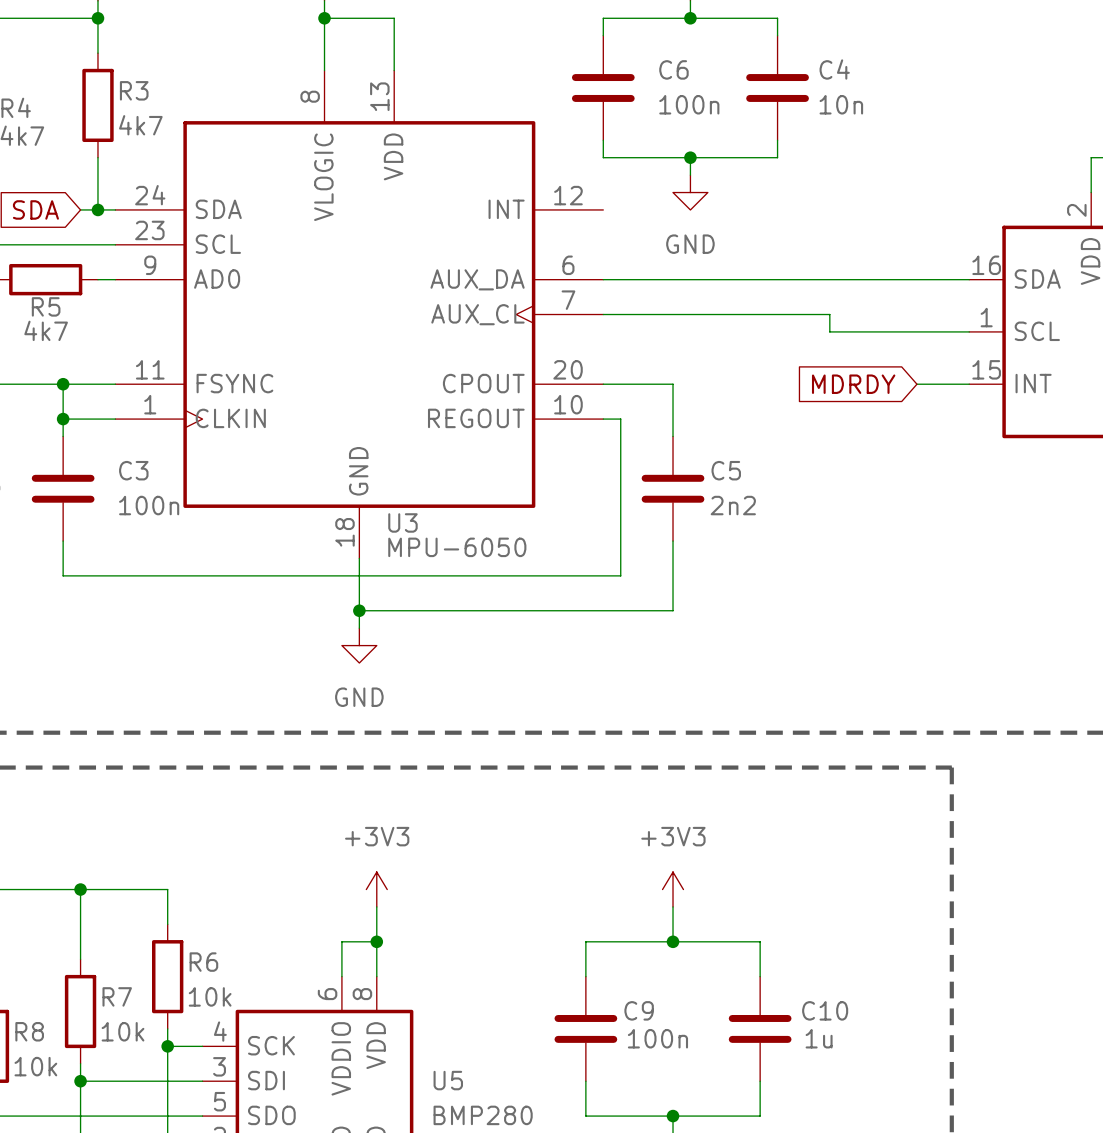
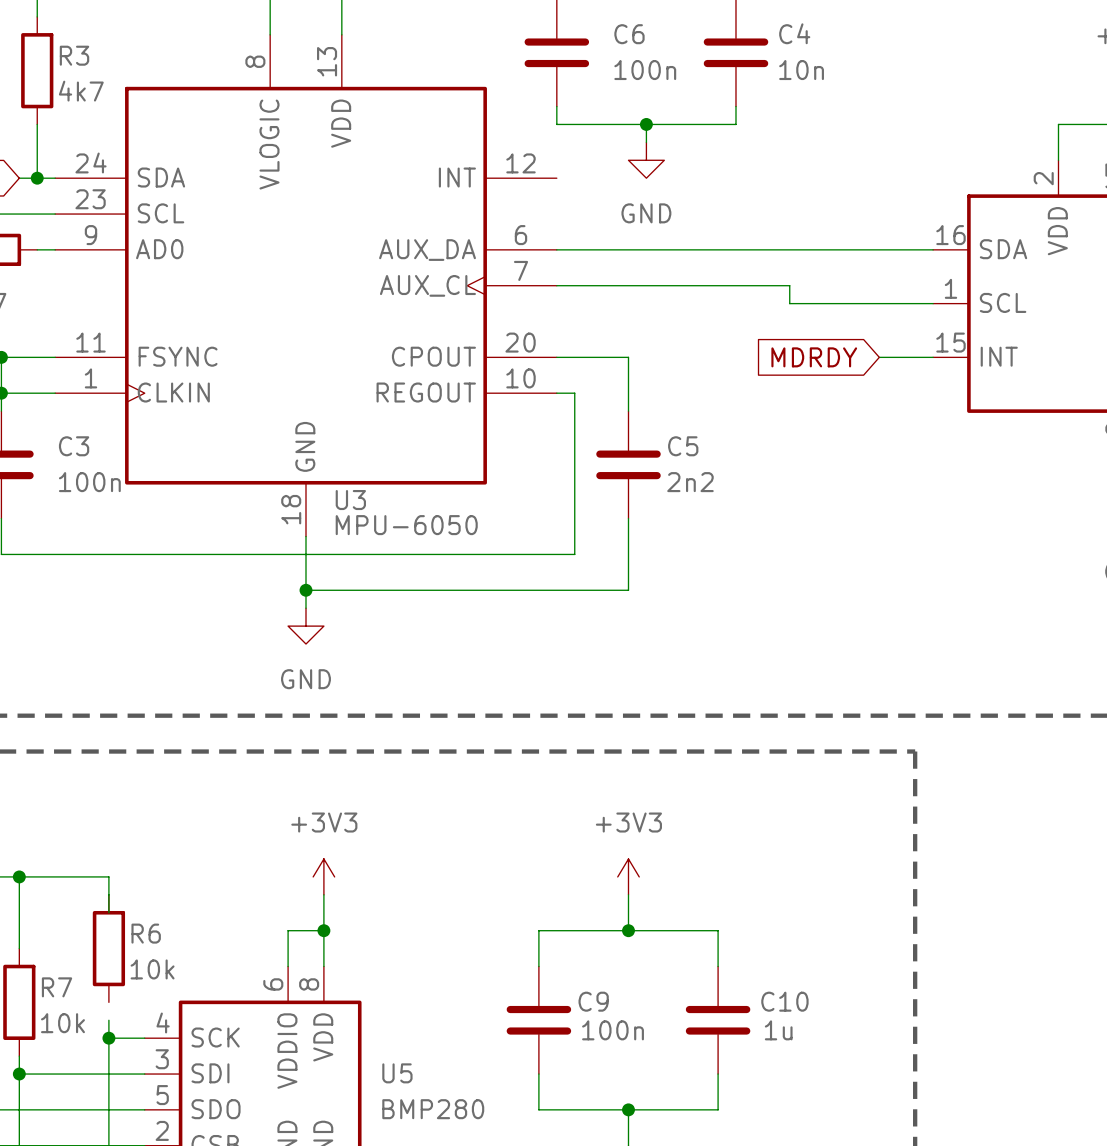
R6 position: (167, 976) -> (108, 948)

